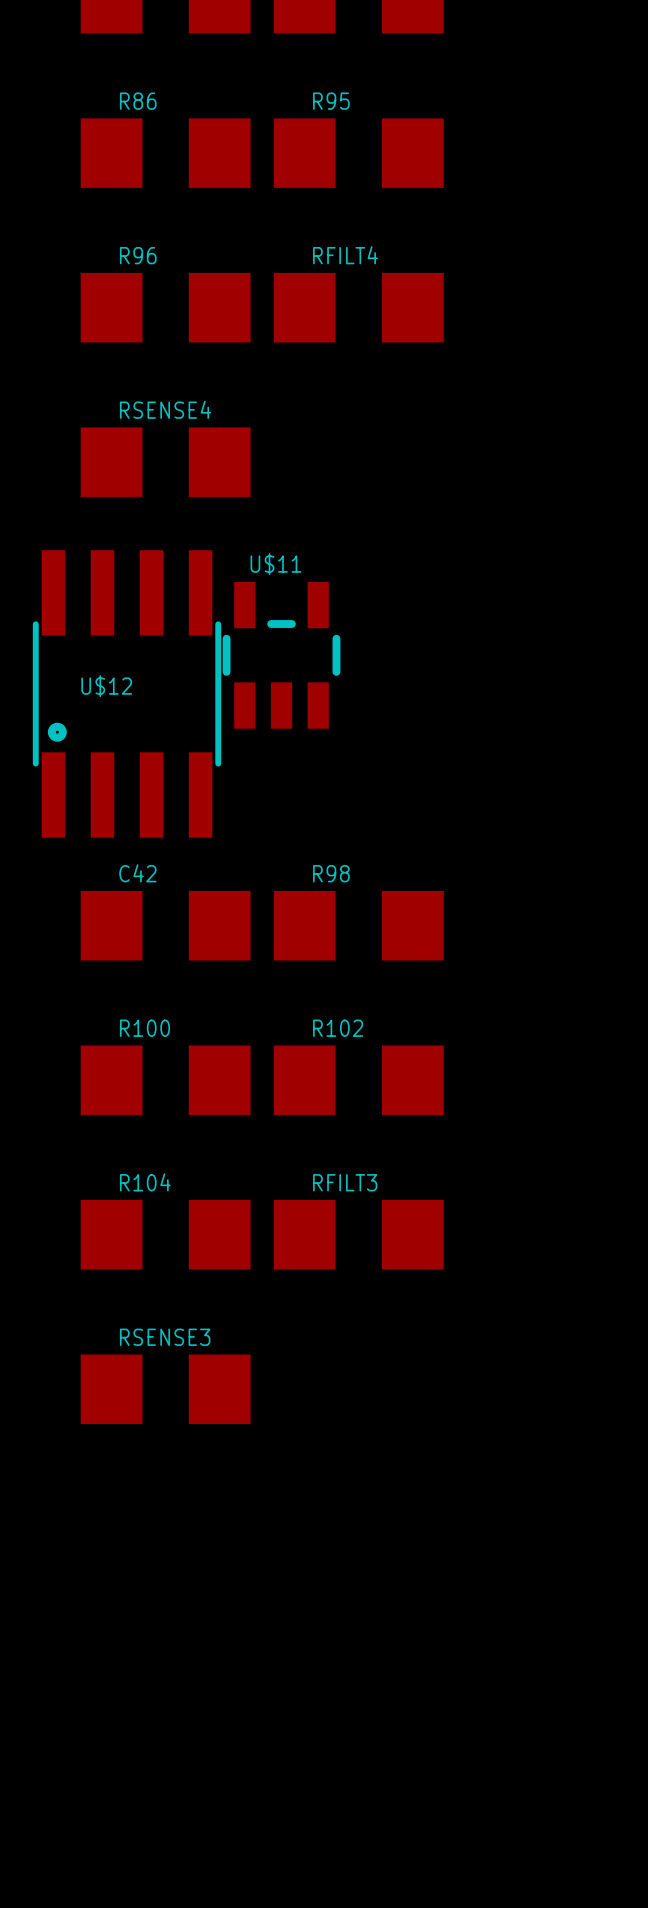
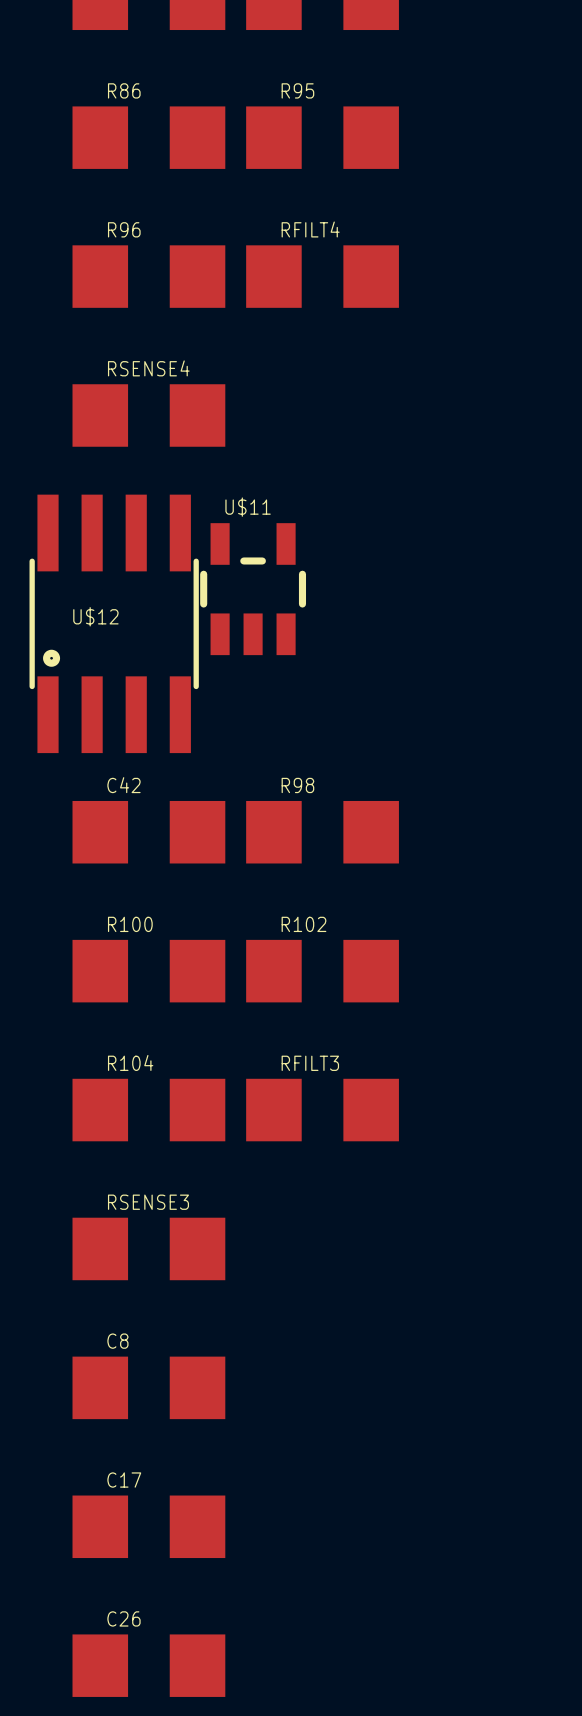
C8: none -> (148, 1387)
C17: none -> (148, 1526)
C26: none -> (148, 1665)

